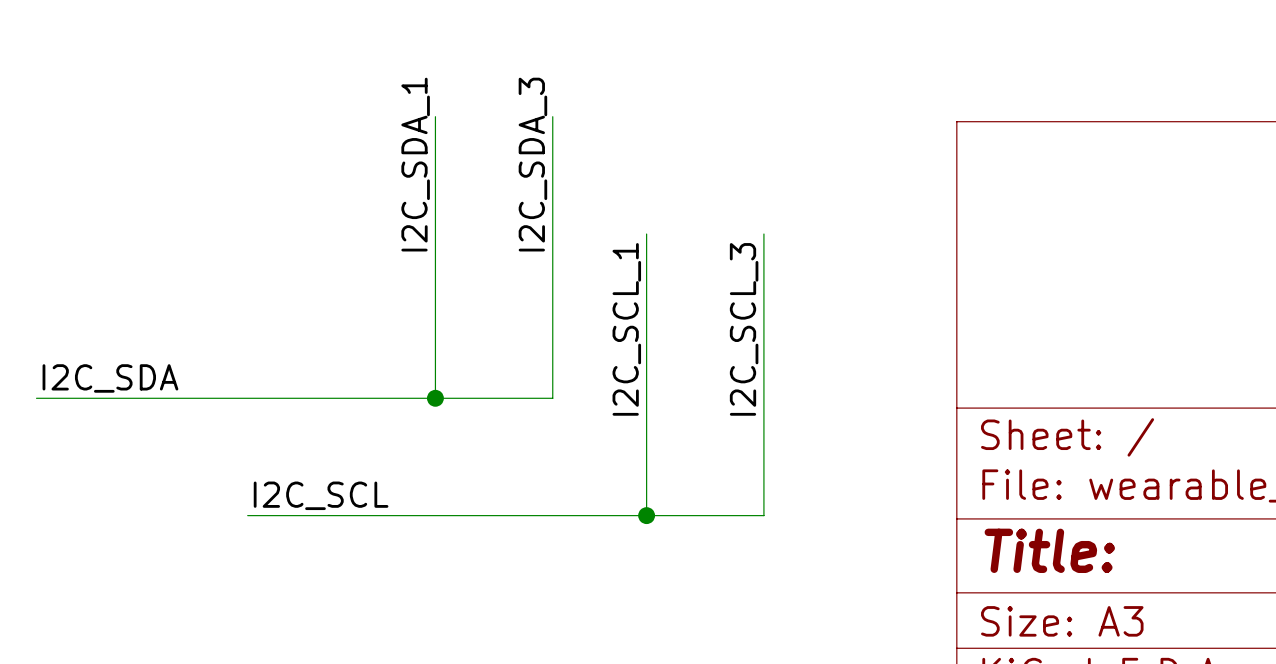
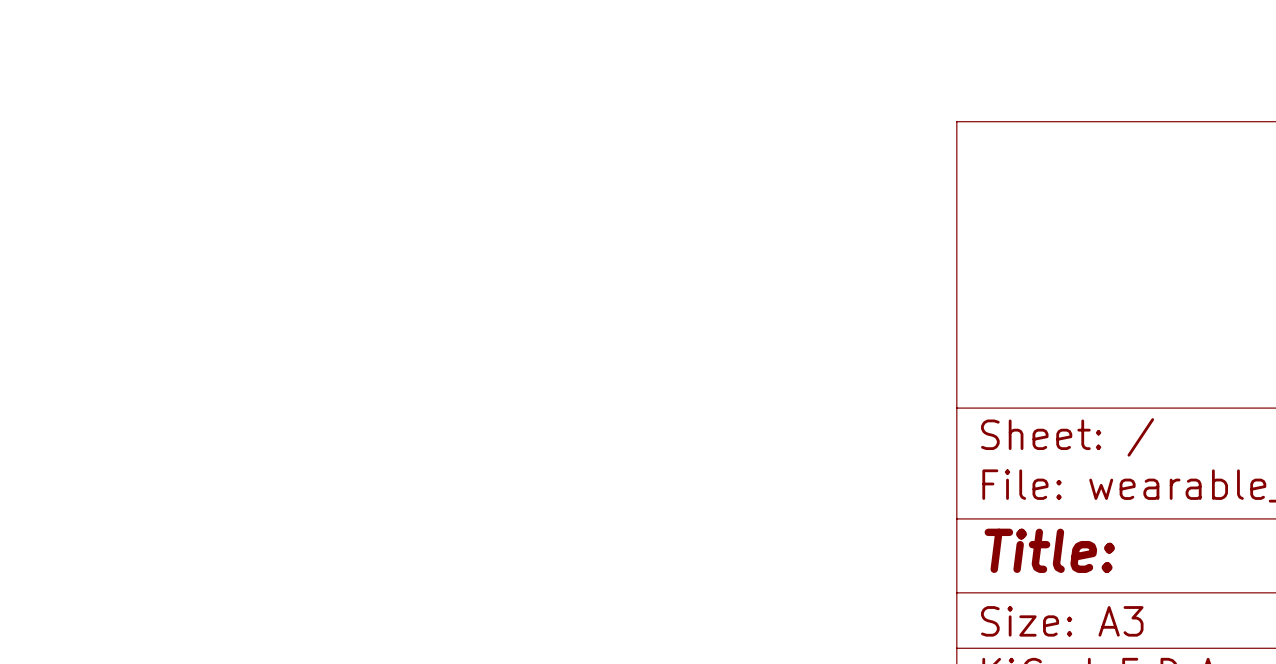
wire: (435, 116) (435, 398) -> none
wire: (552, 116) (552, 398) (36, 398) -> none
label: I2C_SDA_1 (415, 164) -> none
label: I2C_SDA_3 (532, 164) -> none
wire: (646, 234) (646, 515) -> none
wire: (763, 234) (763, 515) (247, 515) -> none
label: I2C_SCL_1 (626, 329) -> none
label: I2C_SCL_3 (744, 329) -> none
label: I2C_SDA (110, 378) -> none
junction: (435, 398) -> none
label: I2C_SCL (321, 495) -> none
junction: (646, 515) -> none

